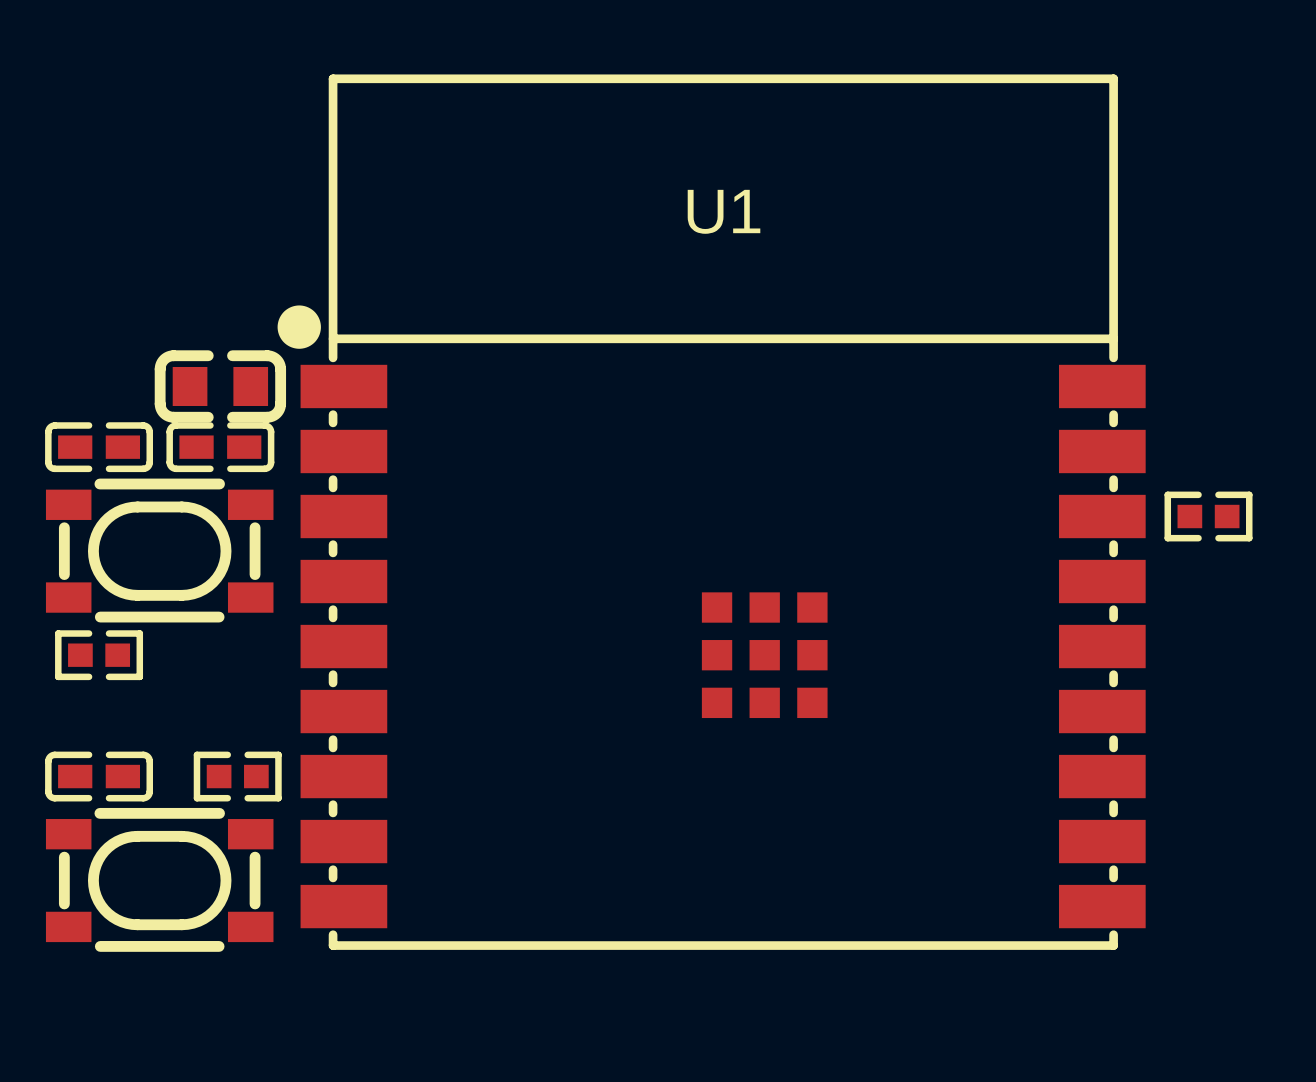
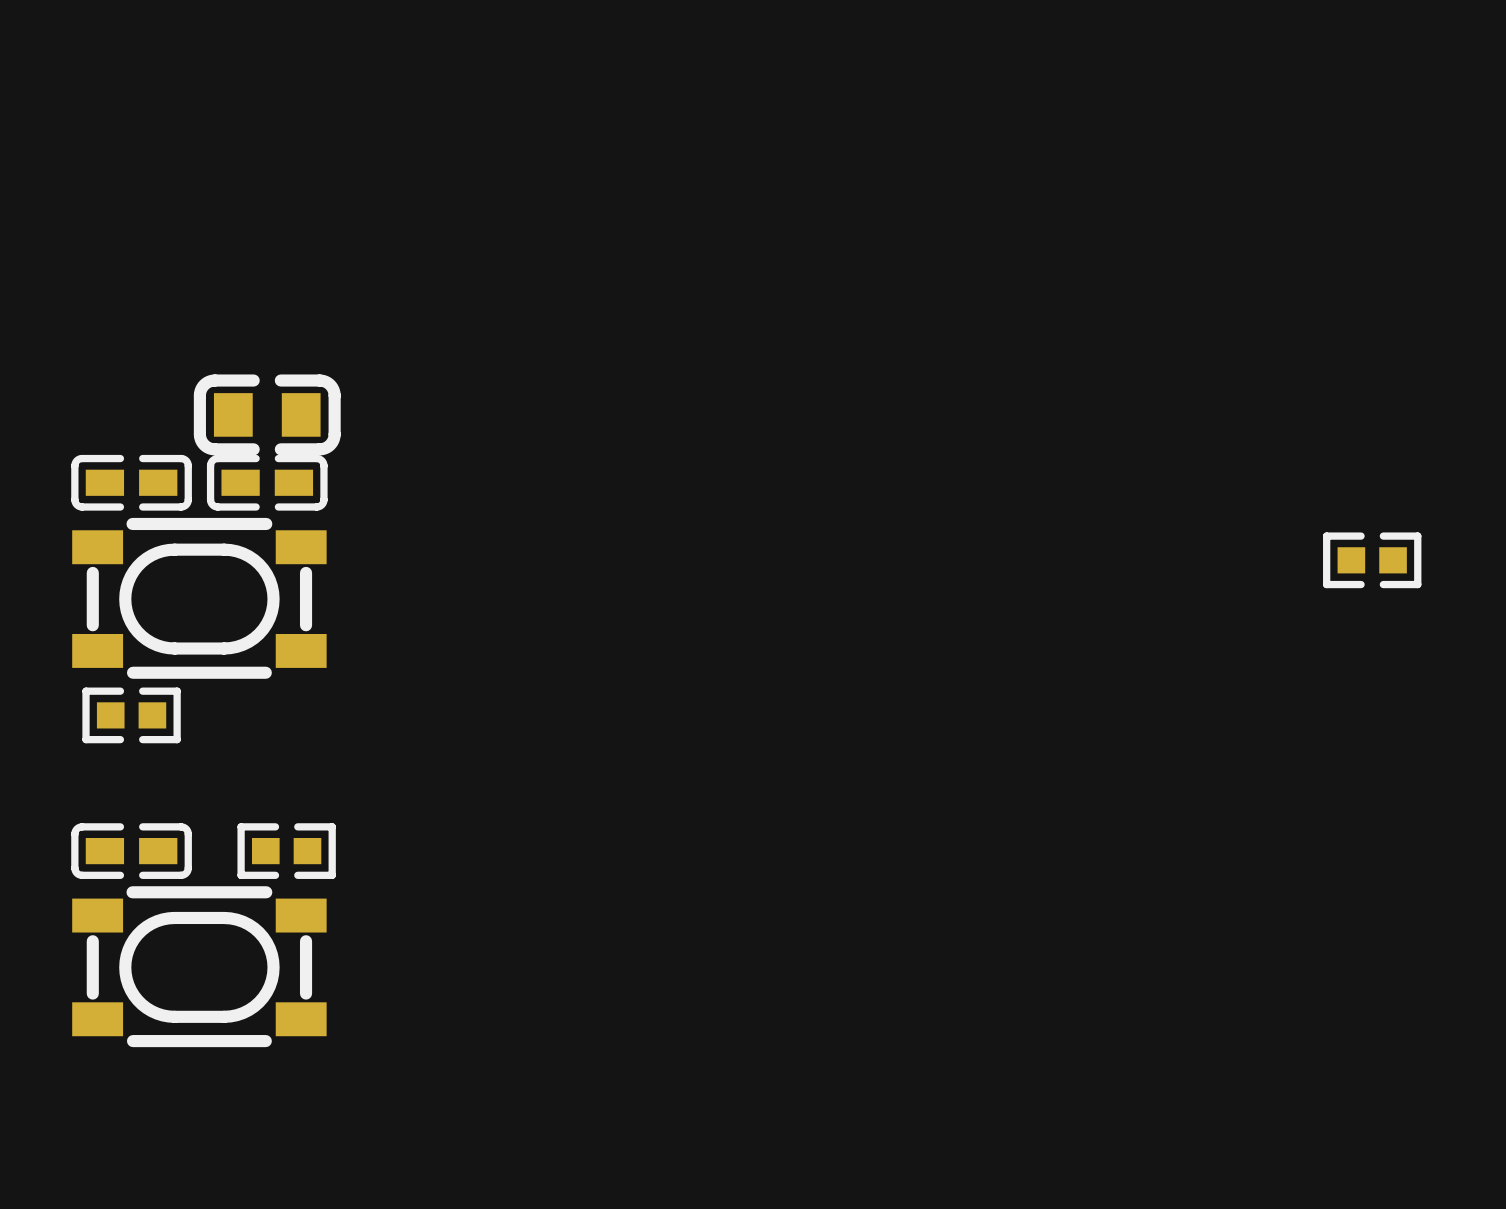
U1: (711, 512) -> none

